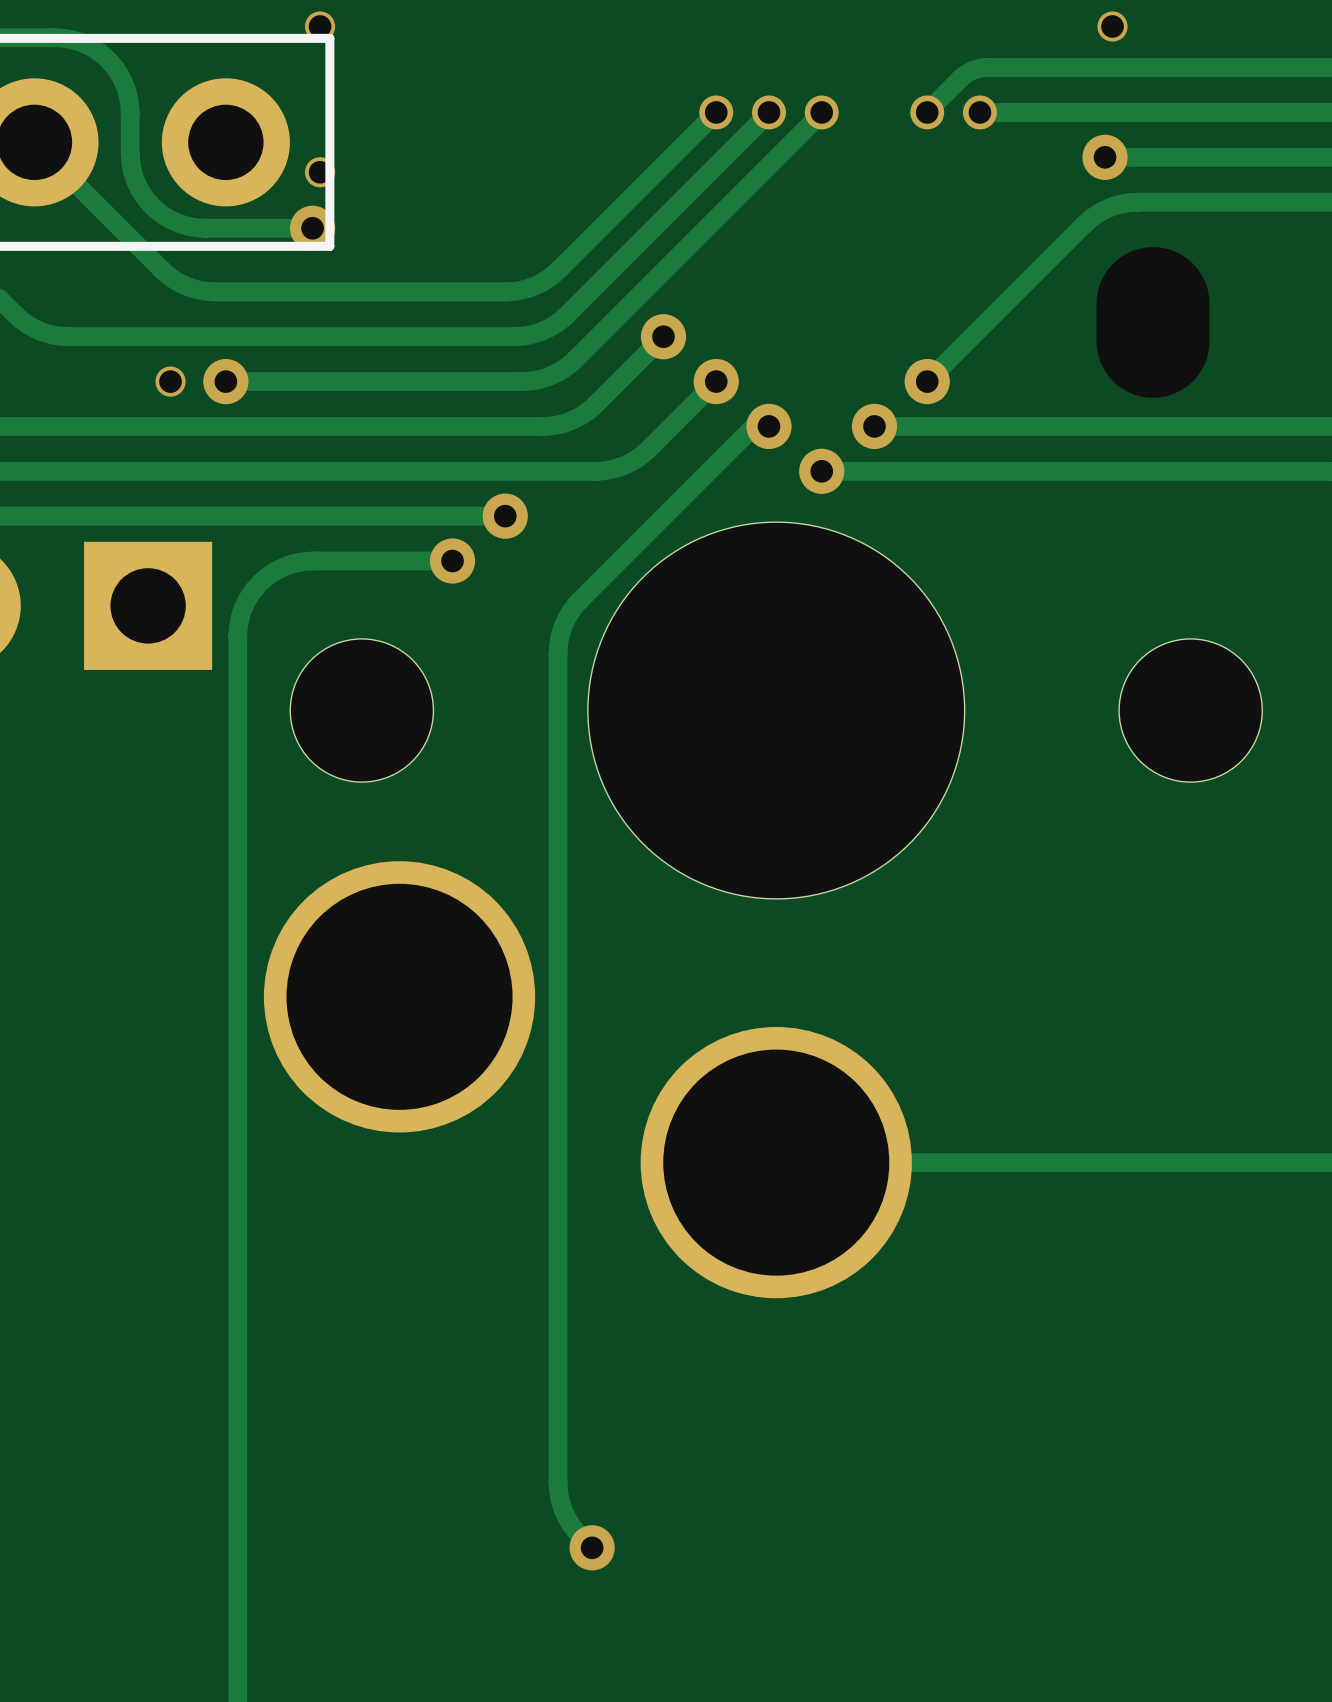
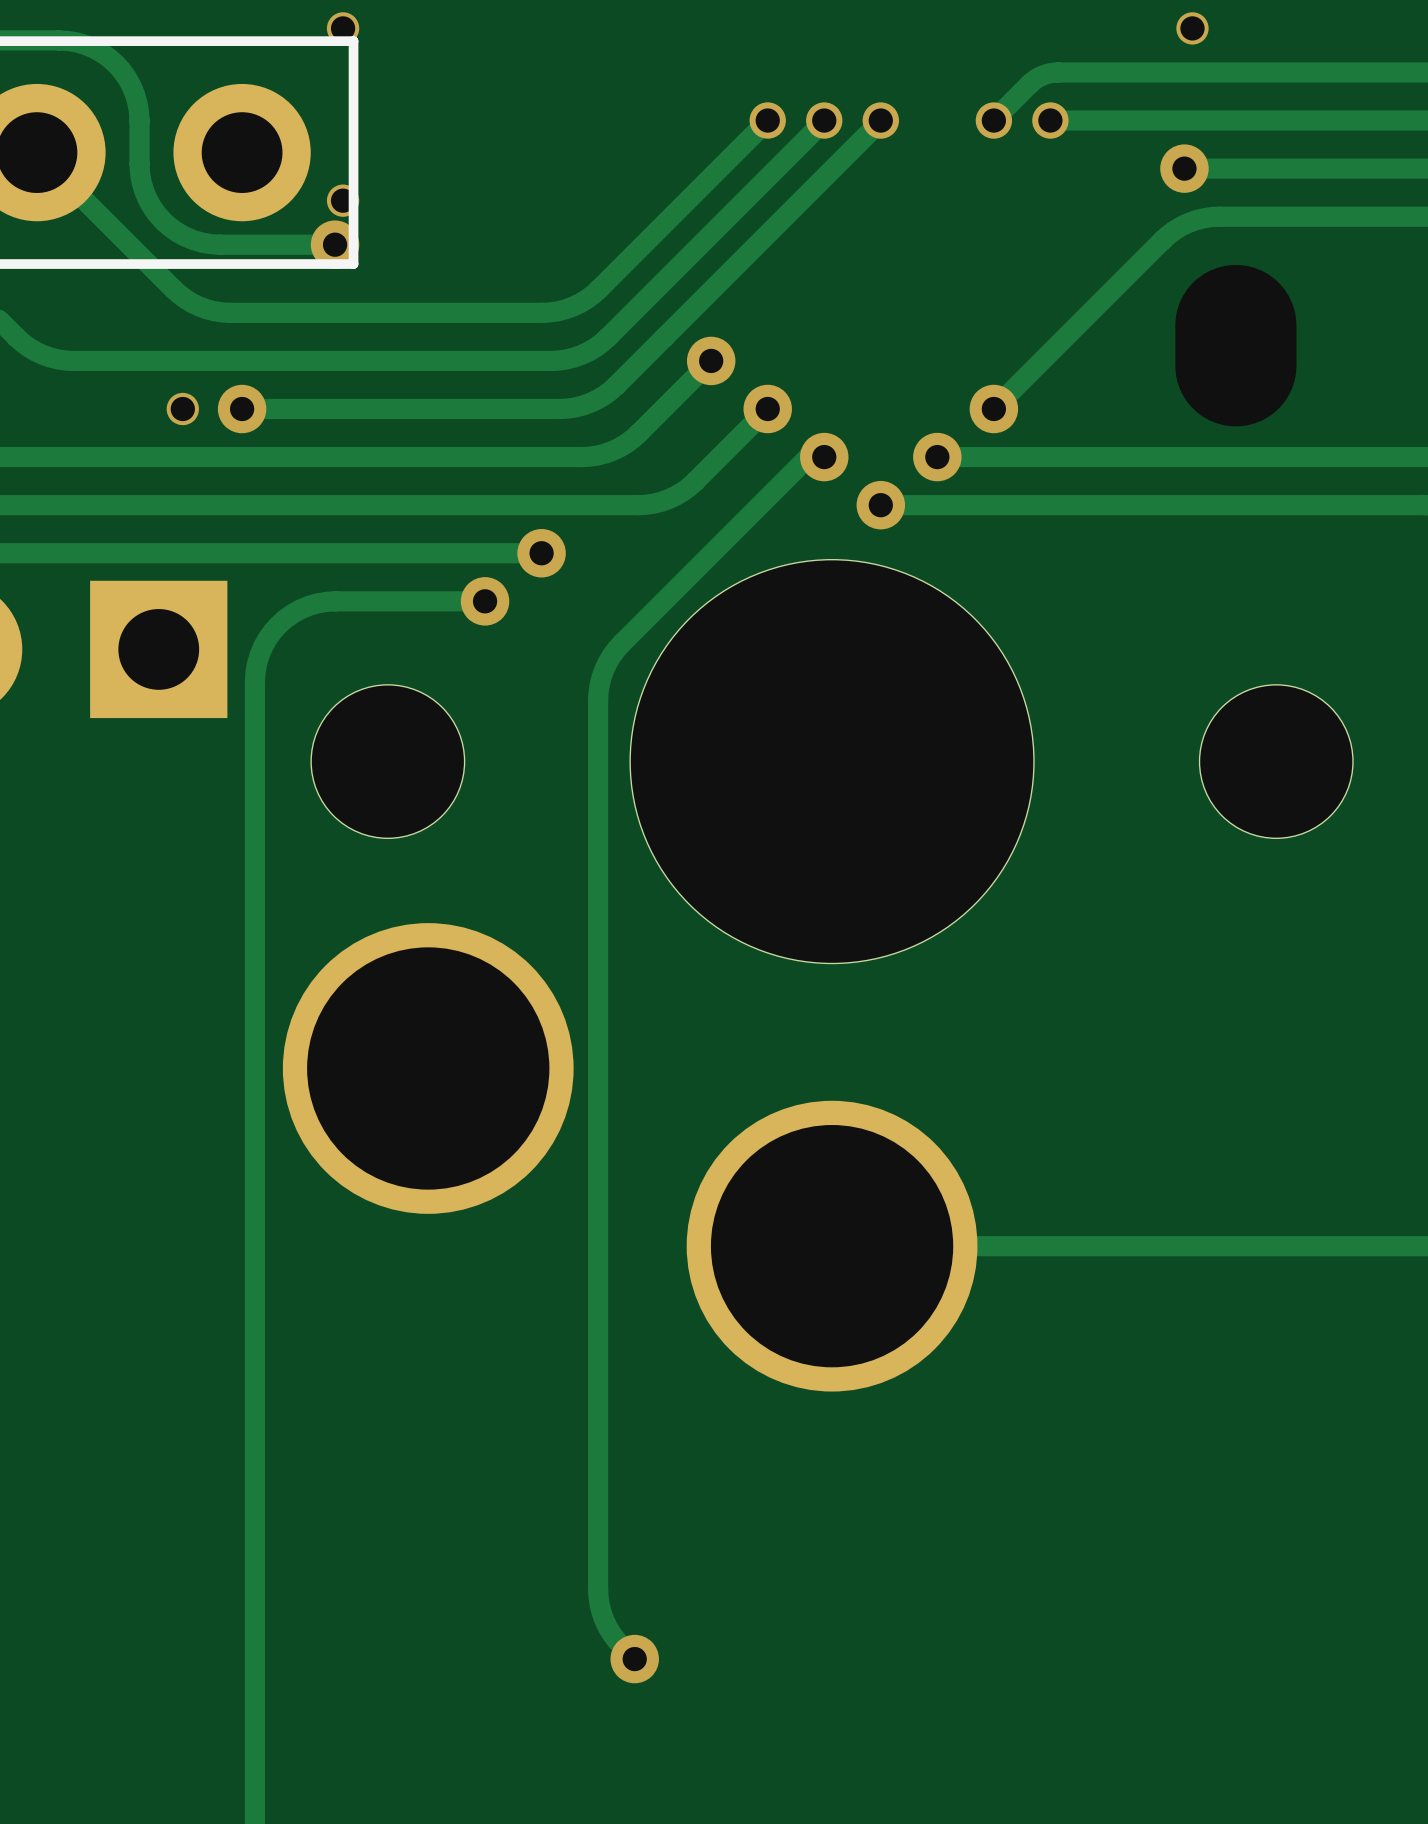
via position: (320, 172) -> (343, 200)

